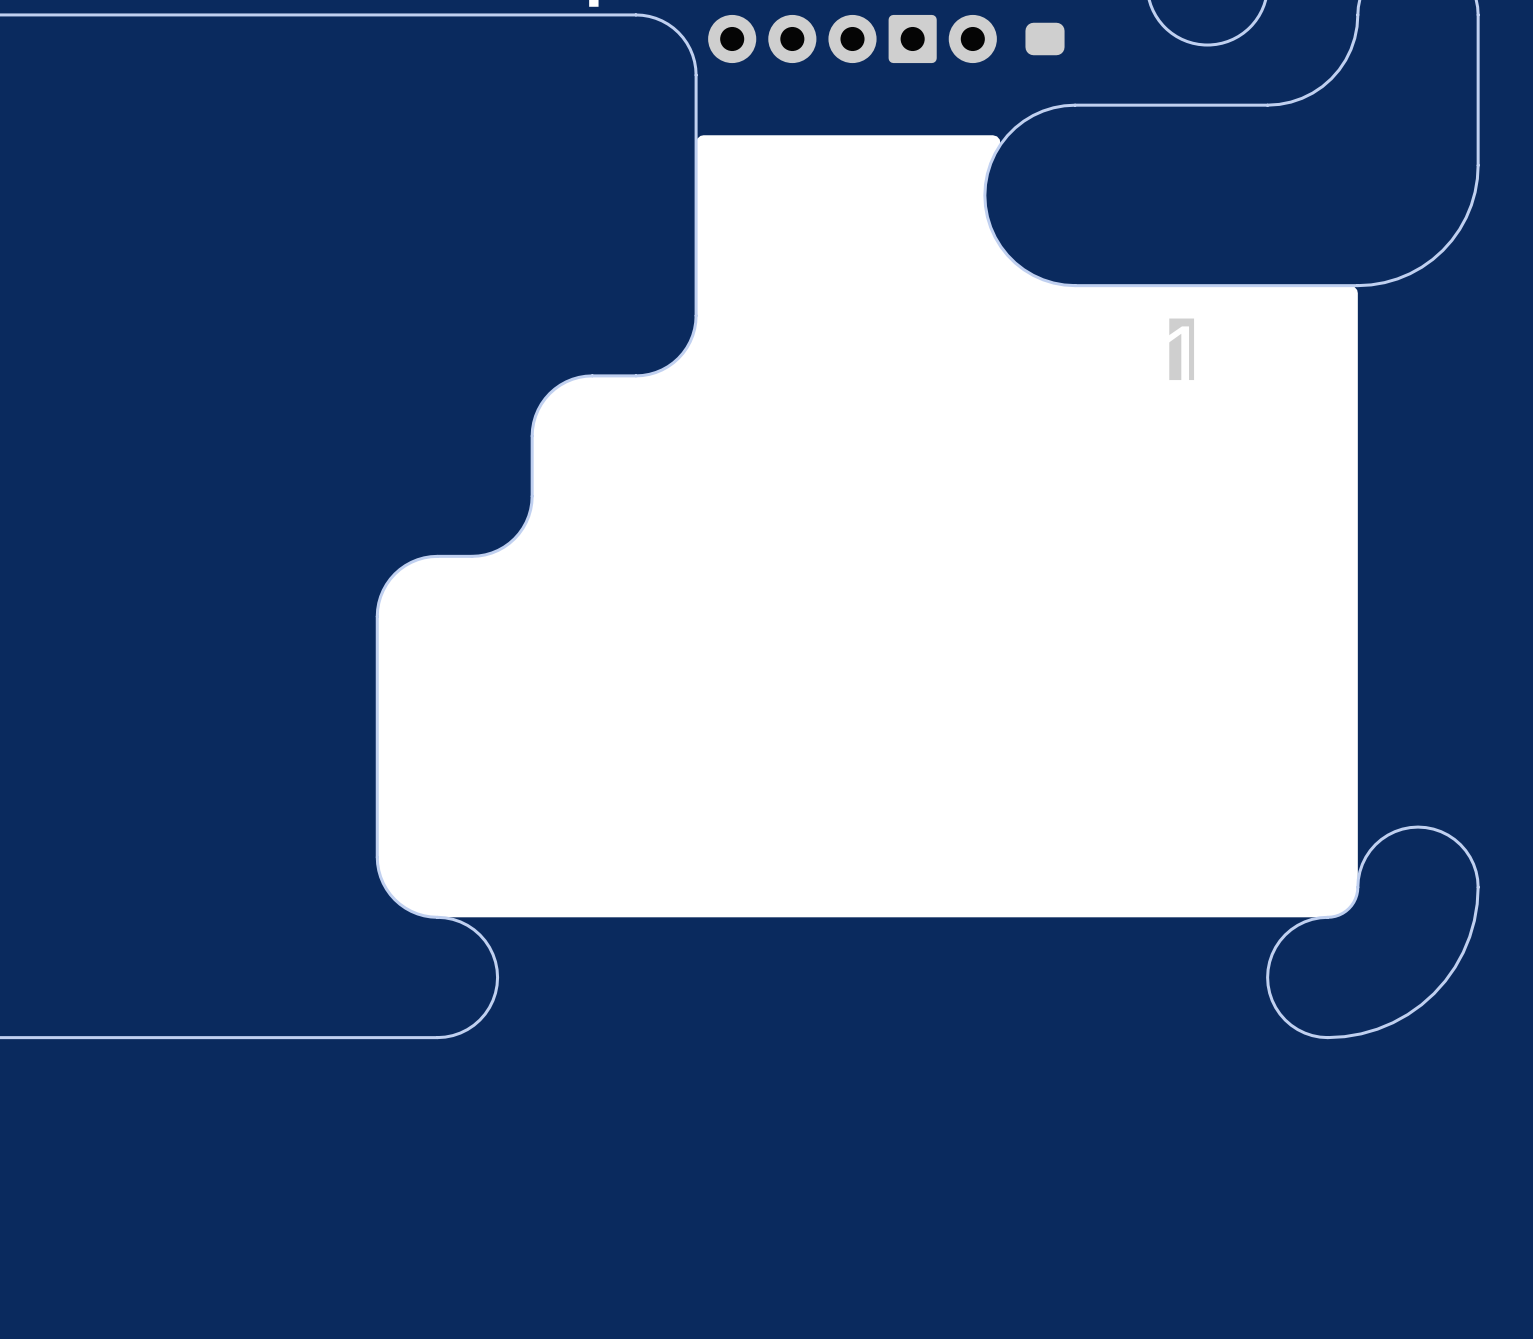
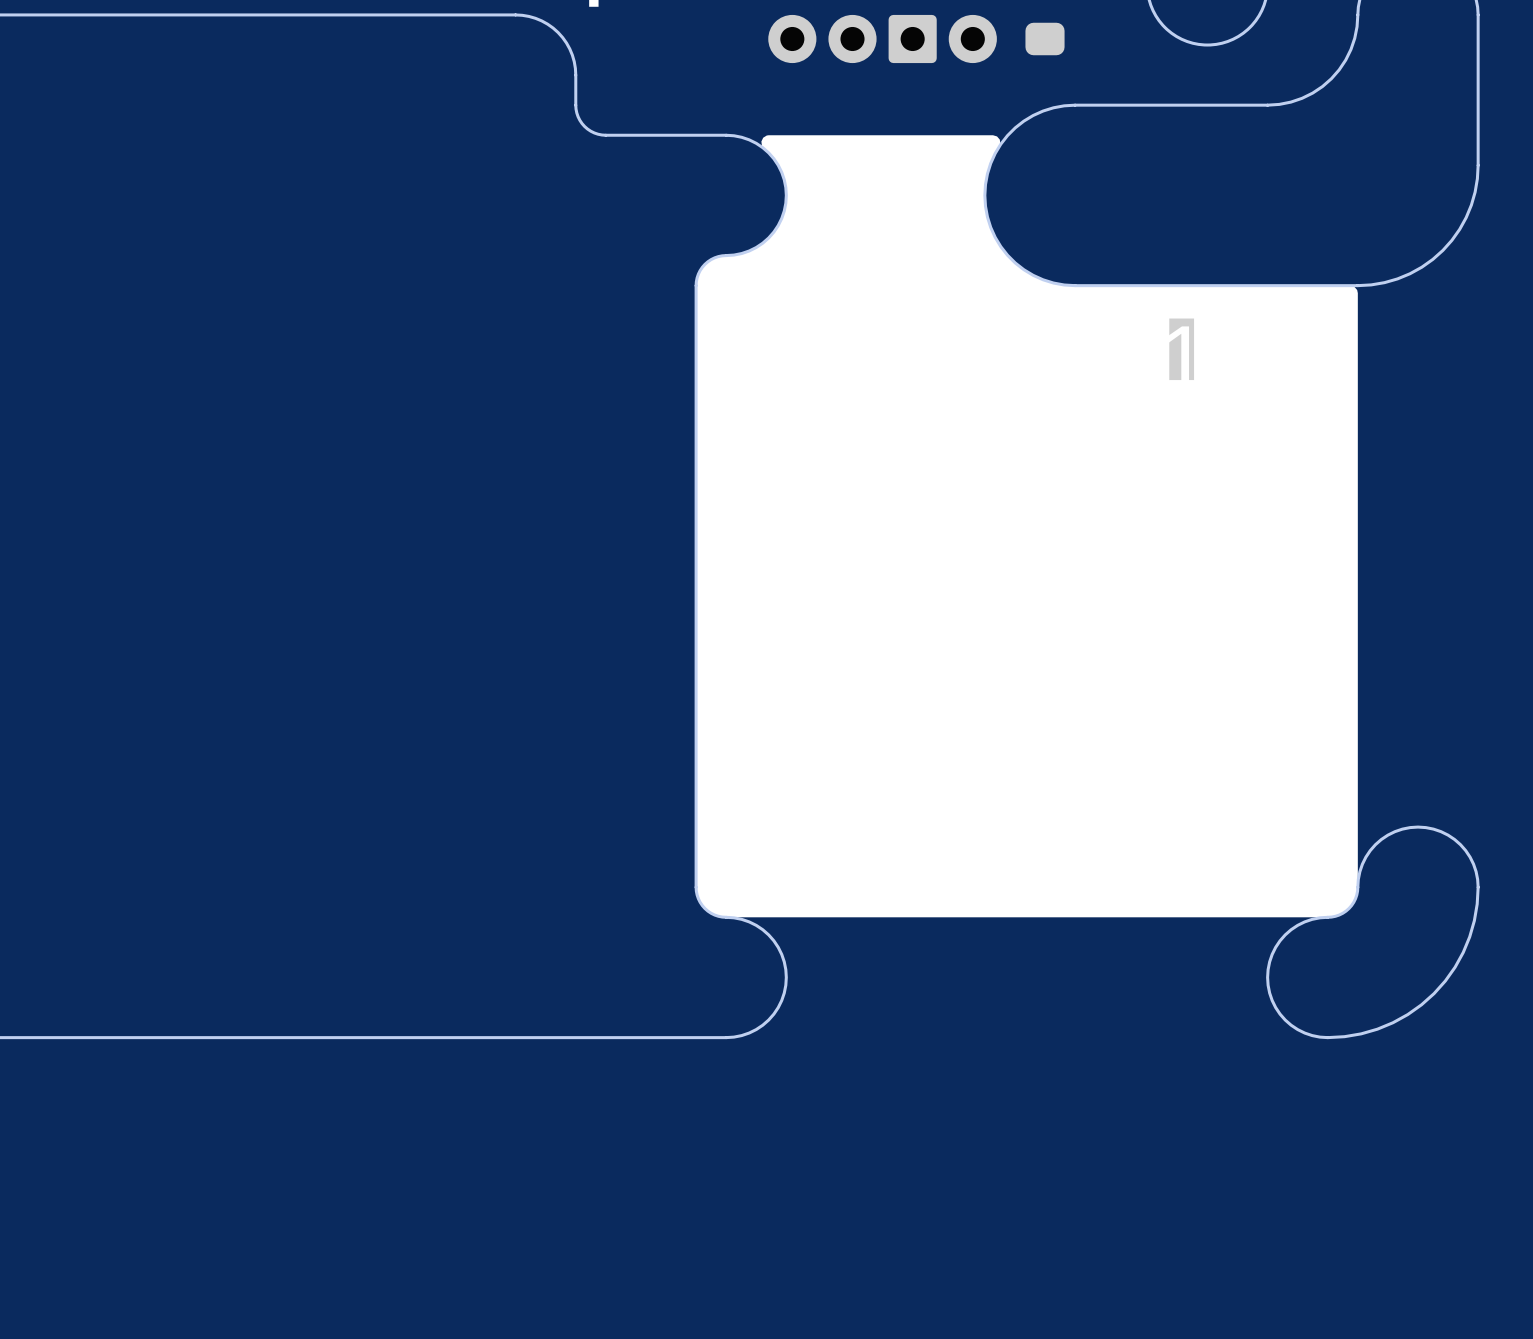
board edge: (515, 14) (642, 15) (655, 18) (667, 24) (678, 32) (686, 43) (692, 55) (696, 75) (696, 285) -> (515, 14) (529, 16) (541, 20) (553, 28) (566, 43) (572, 55) (575, 68) (576, 112) (581, 123) (590, 131) (605, 135) (734, 135) (749, 139) (762, 147) (778, 165) (784, 179) (786, 195) (781, 218) (773, 232) (762, 243) (749, 250) (718, 256) (707, 261) (700, 270) (696, 285)
part: (732, 39) -> none
drawing: [377, 135, 1358, 918] -> none
drawing: none -> [696, 135, 1358, 918]
board edge: (696, 315) (694, 329) (686, 347) (678, 358) (662, 369) (642, 375) (578, 377) (560, 385) (545, 398) (535, 416) (532, 429) (530, 509) (522, 528) (509, 543) (498, 550) (485, 554) (430, 556) (411, 562) (399, 569) (390, 579) (380, 596) (377, 616) (377, 857) (380, 877) (390, 894) (405, 908) (424, 915) (452, 919) (474, 929) (489, 947) (497, 969) (495, 993) (485, 1014) (467, 1029) (452, 1035) (437, 1037) -> (696, 315) (696, 891) (702, 905) (711, 913) (749, 921) (762, 929) (773, 940) (781, 954) (785, 969) (785, 985) (781, 1000) (773, 1014) (762, 1025) (749, 1033) (734, 1037) (437, 1037)

